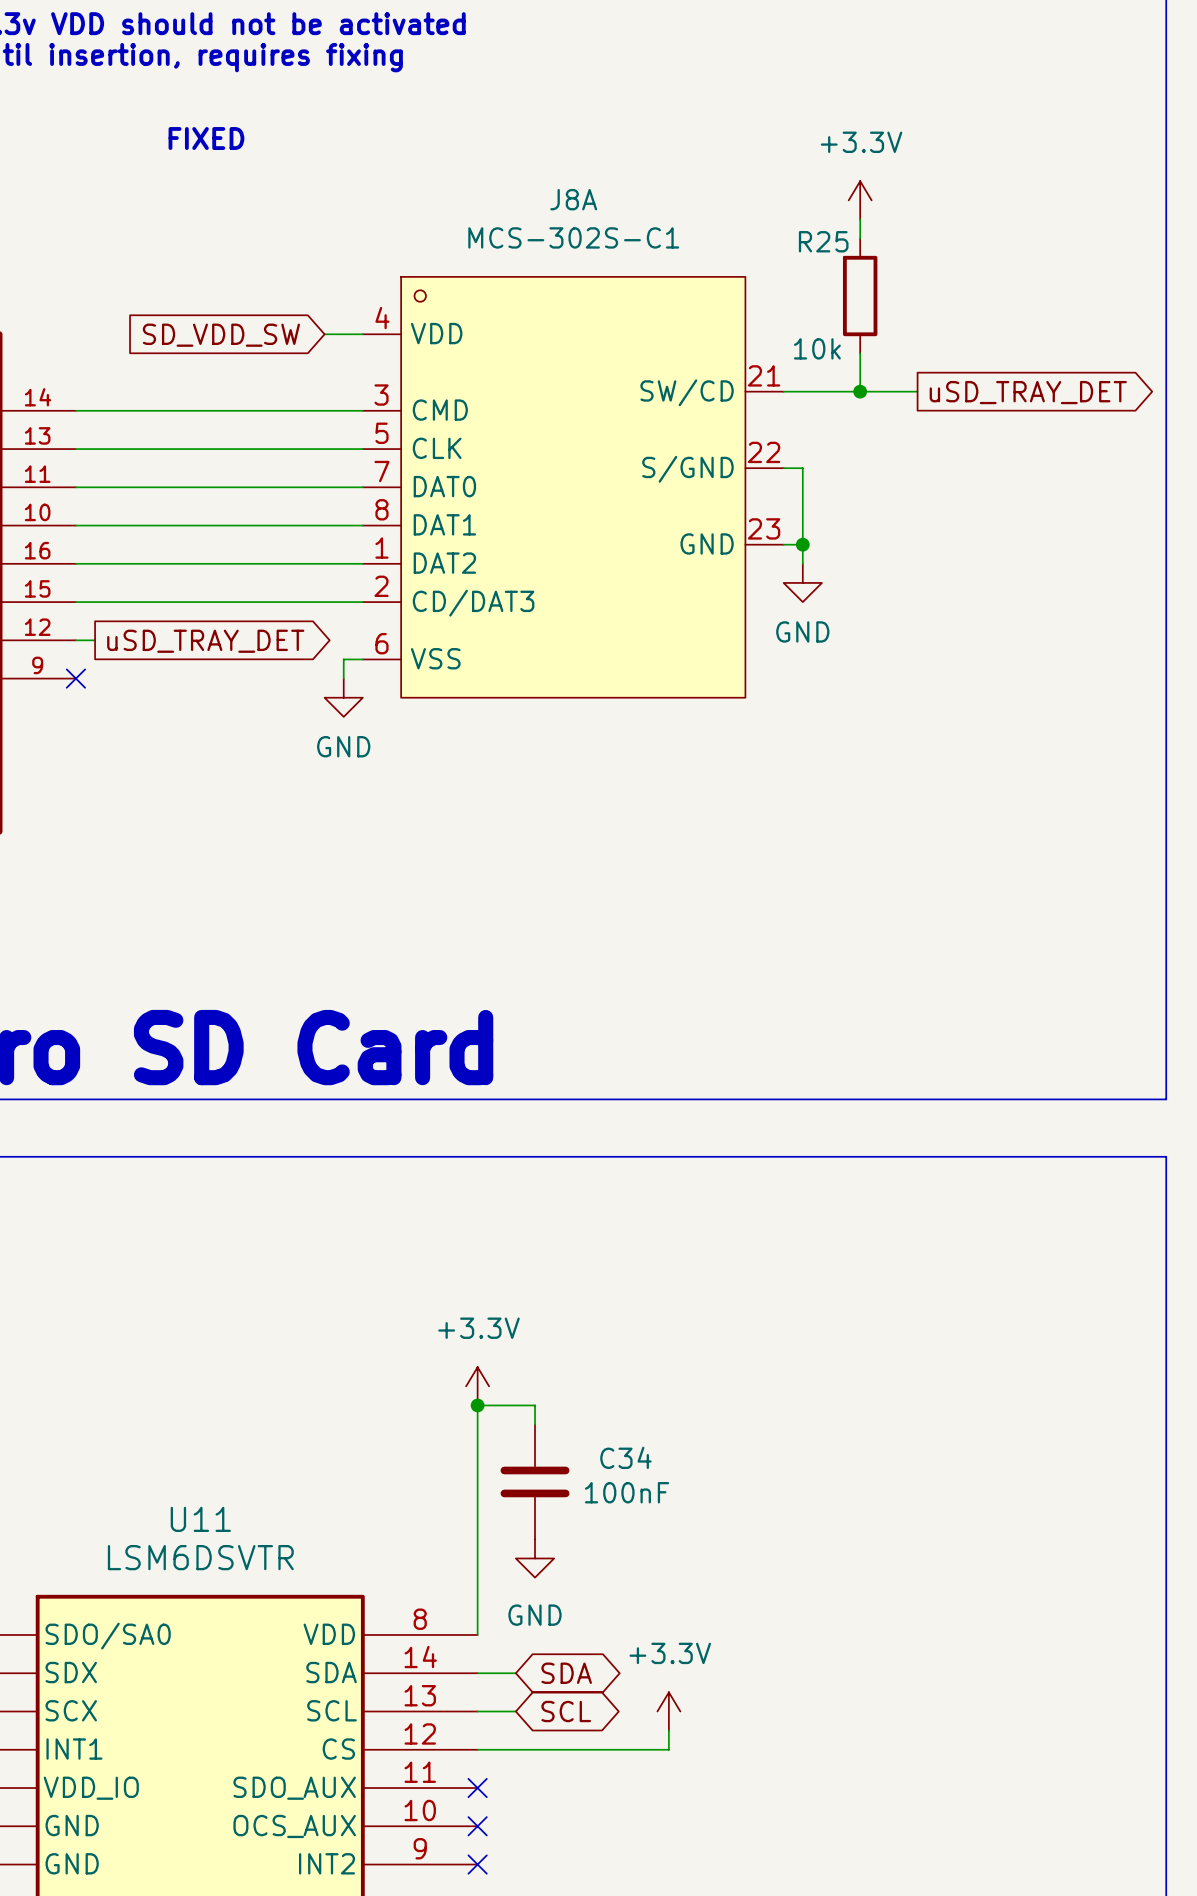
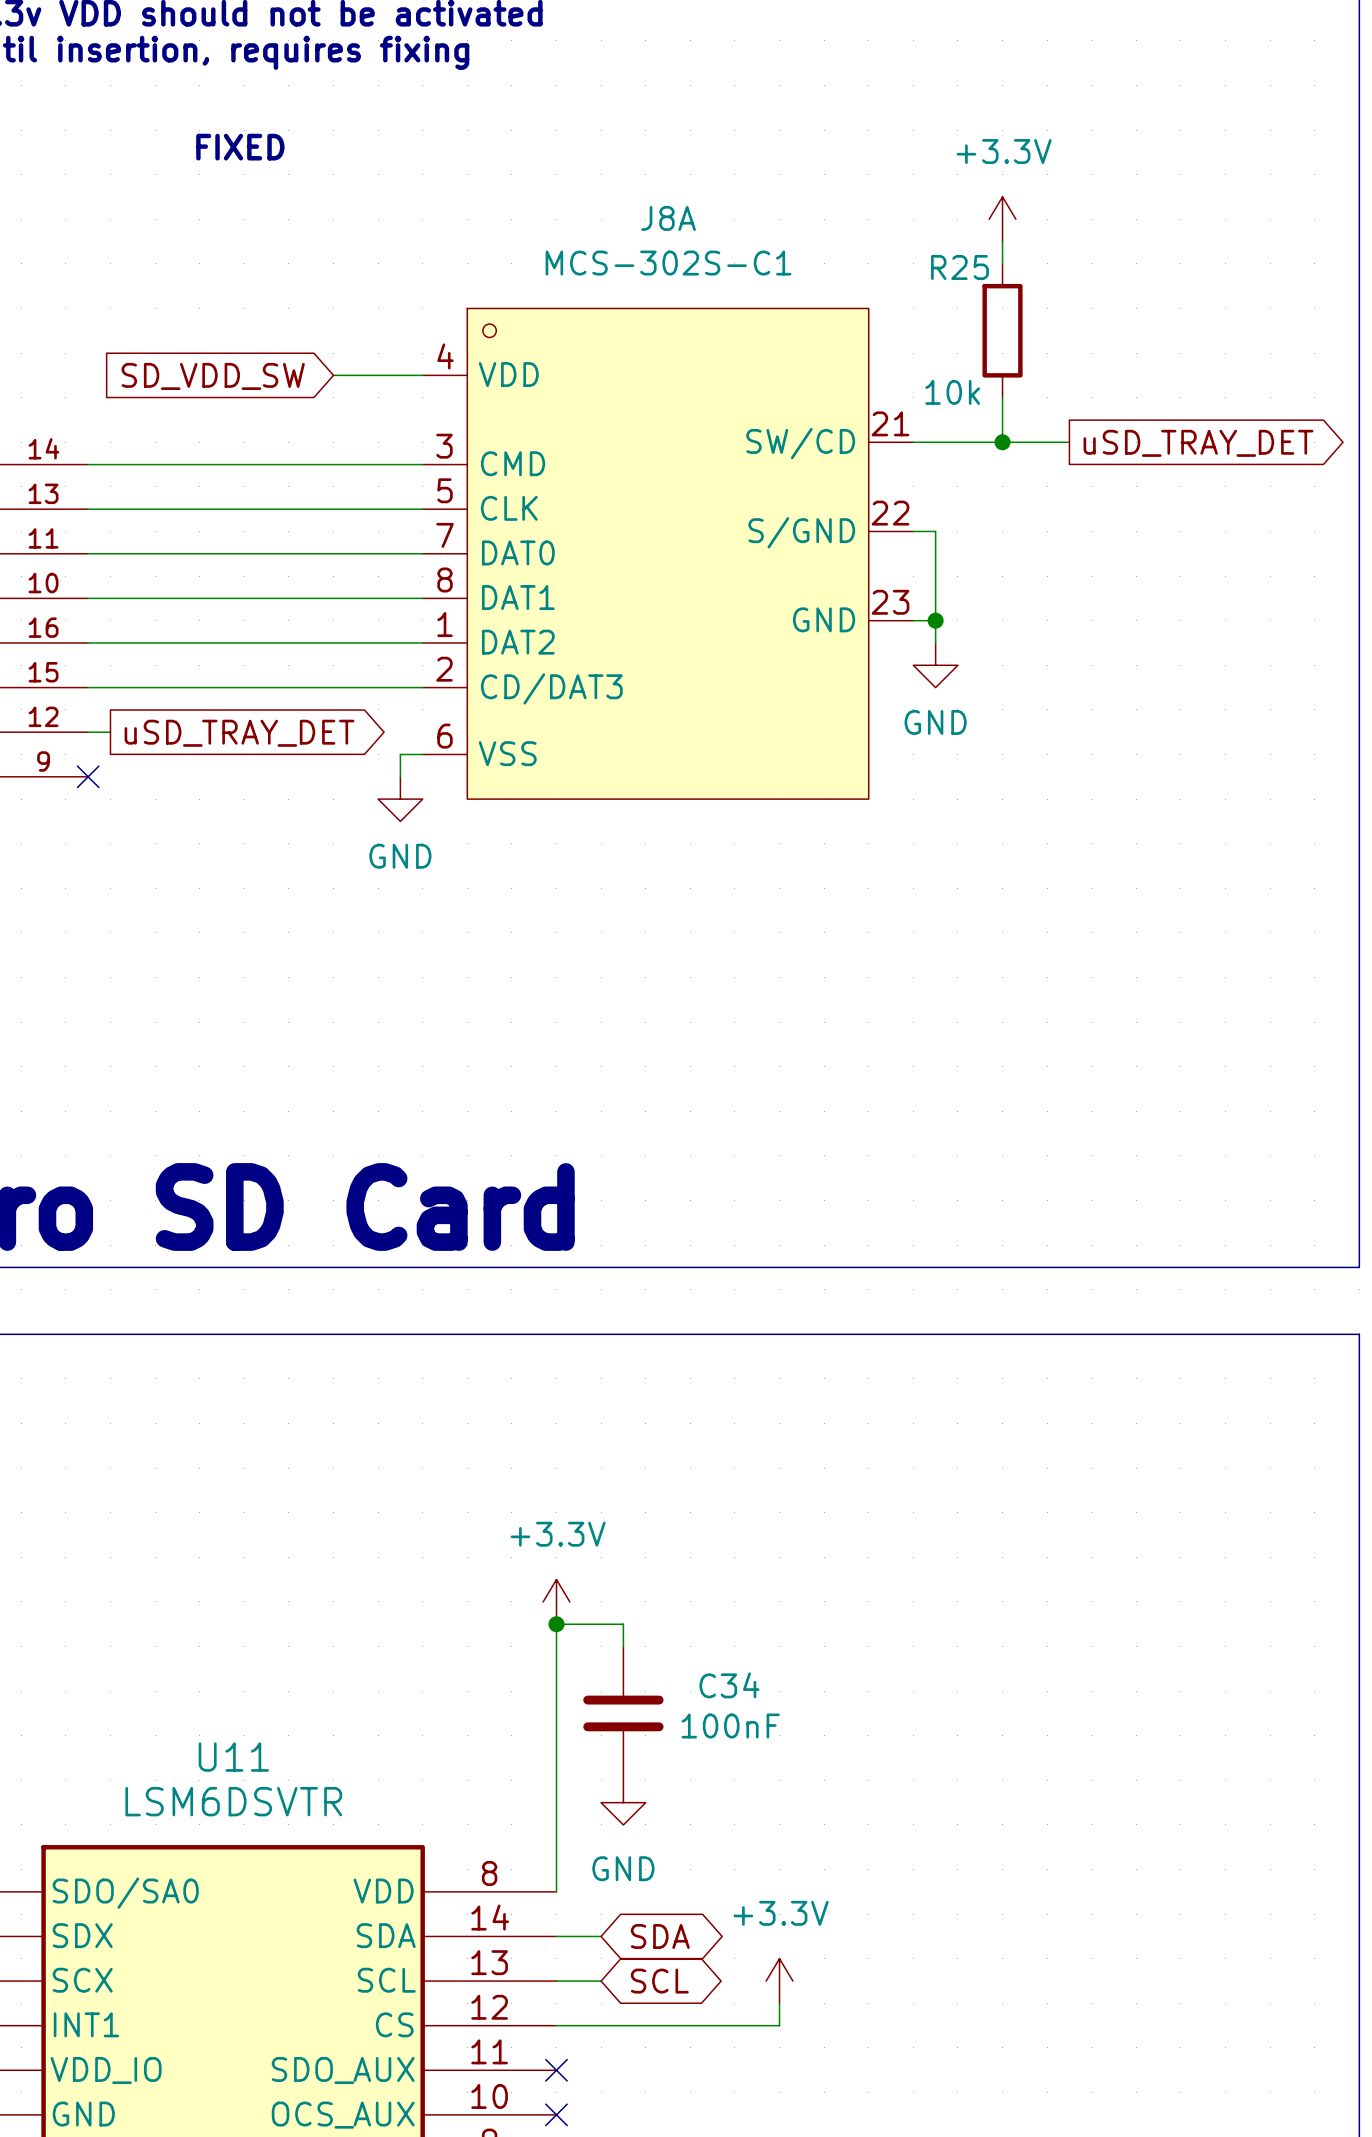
wire: none -> (333, 375) (378, 375)
global label position: SD_VDD_SW (221, 335) -> SD_VDD_SW (213, 376)

